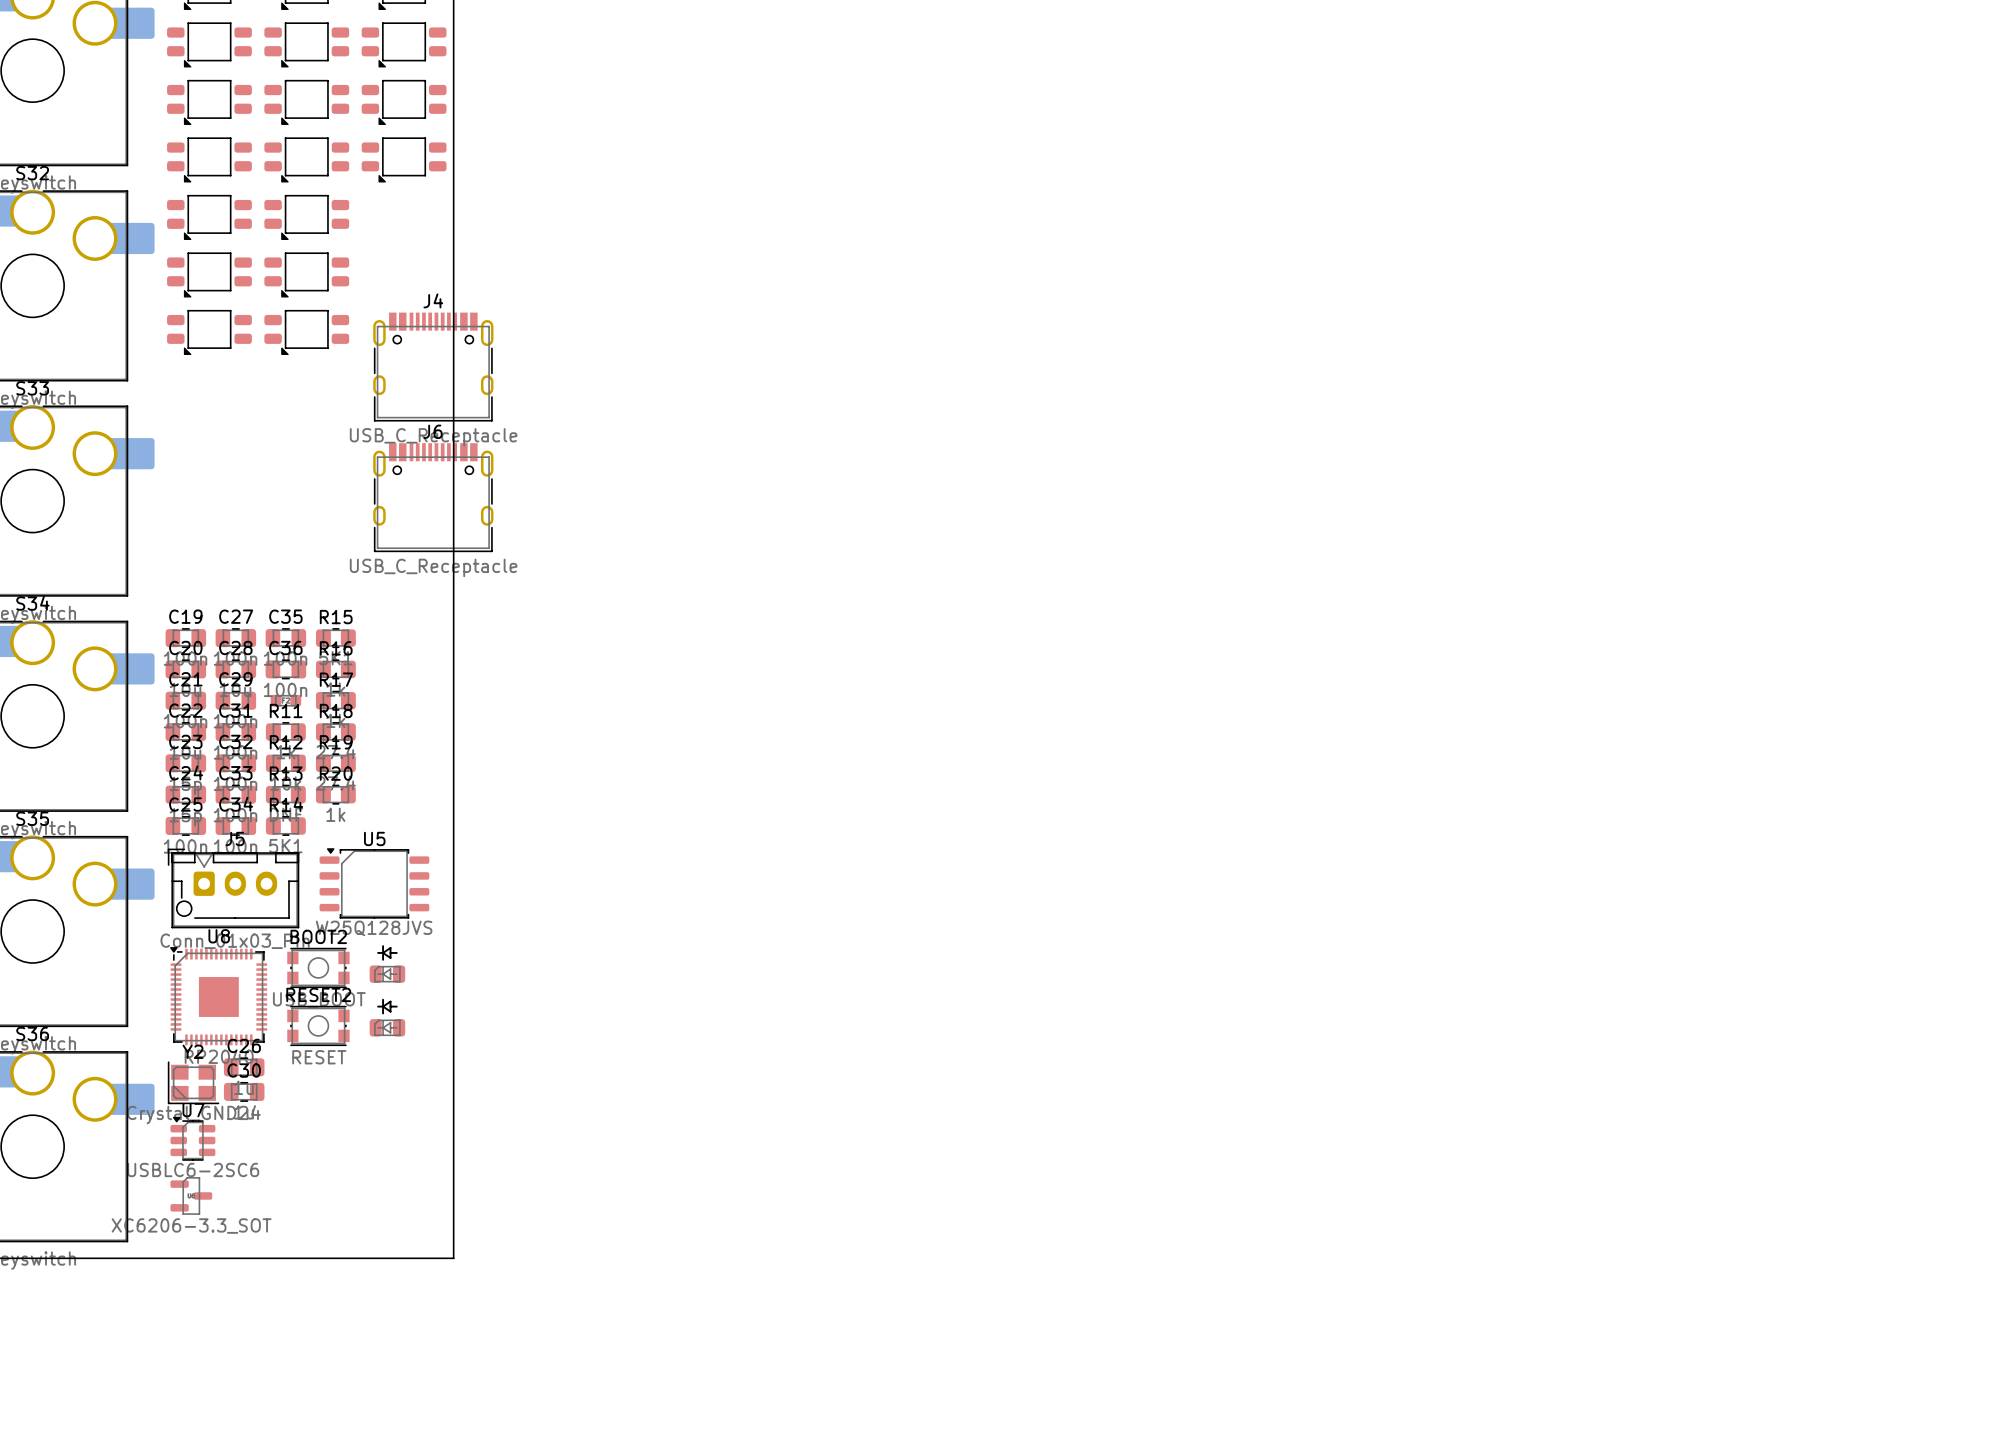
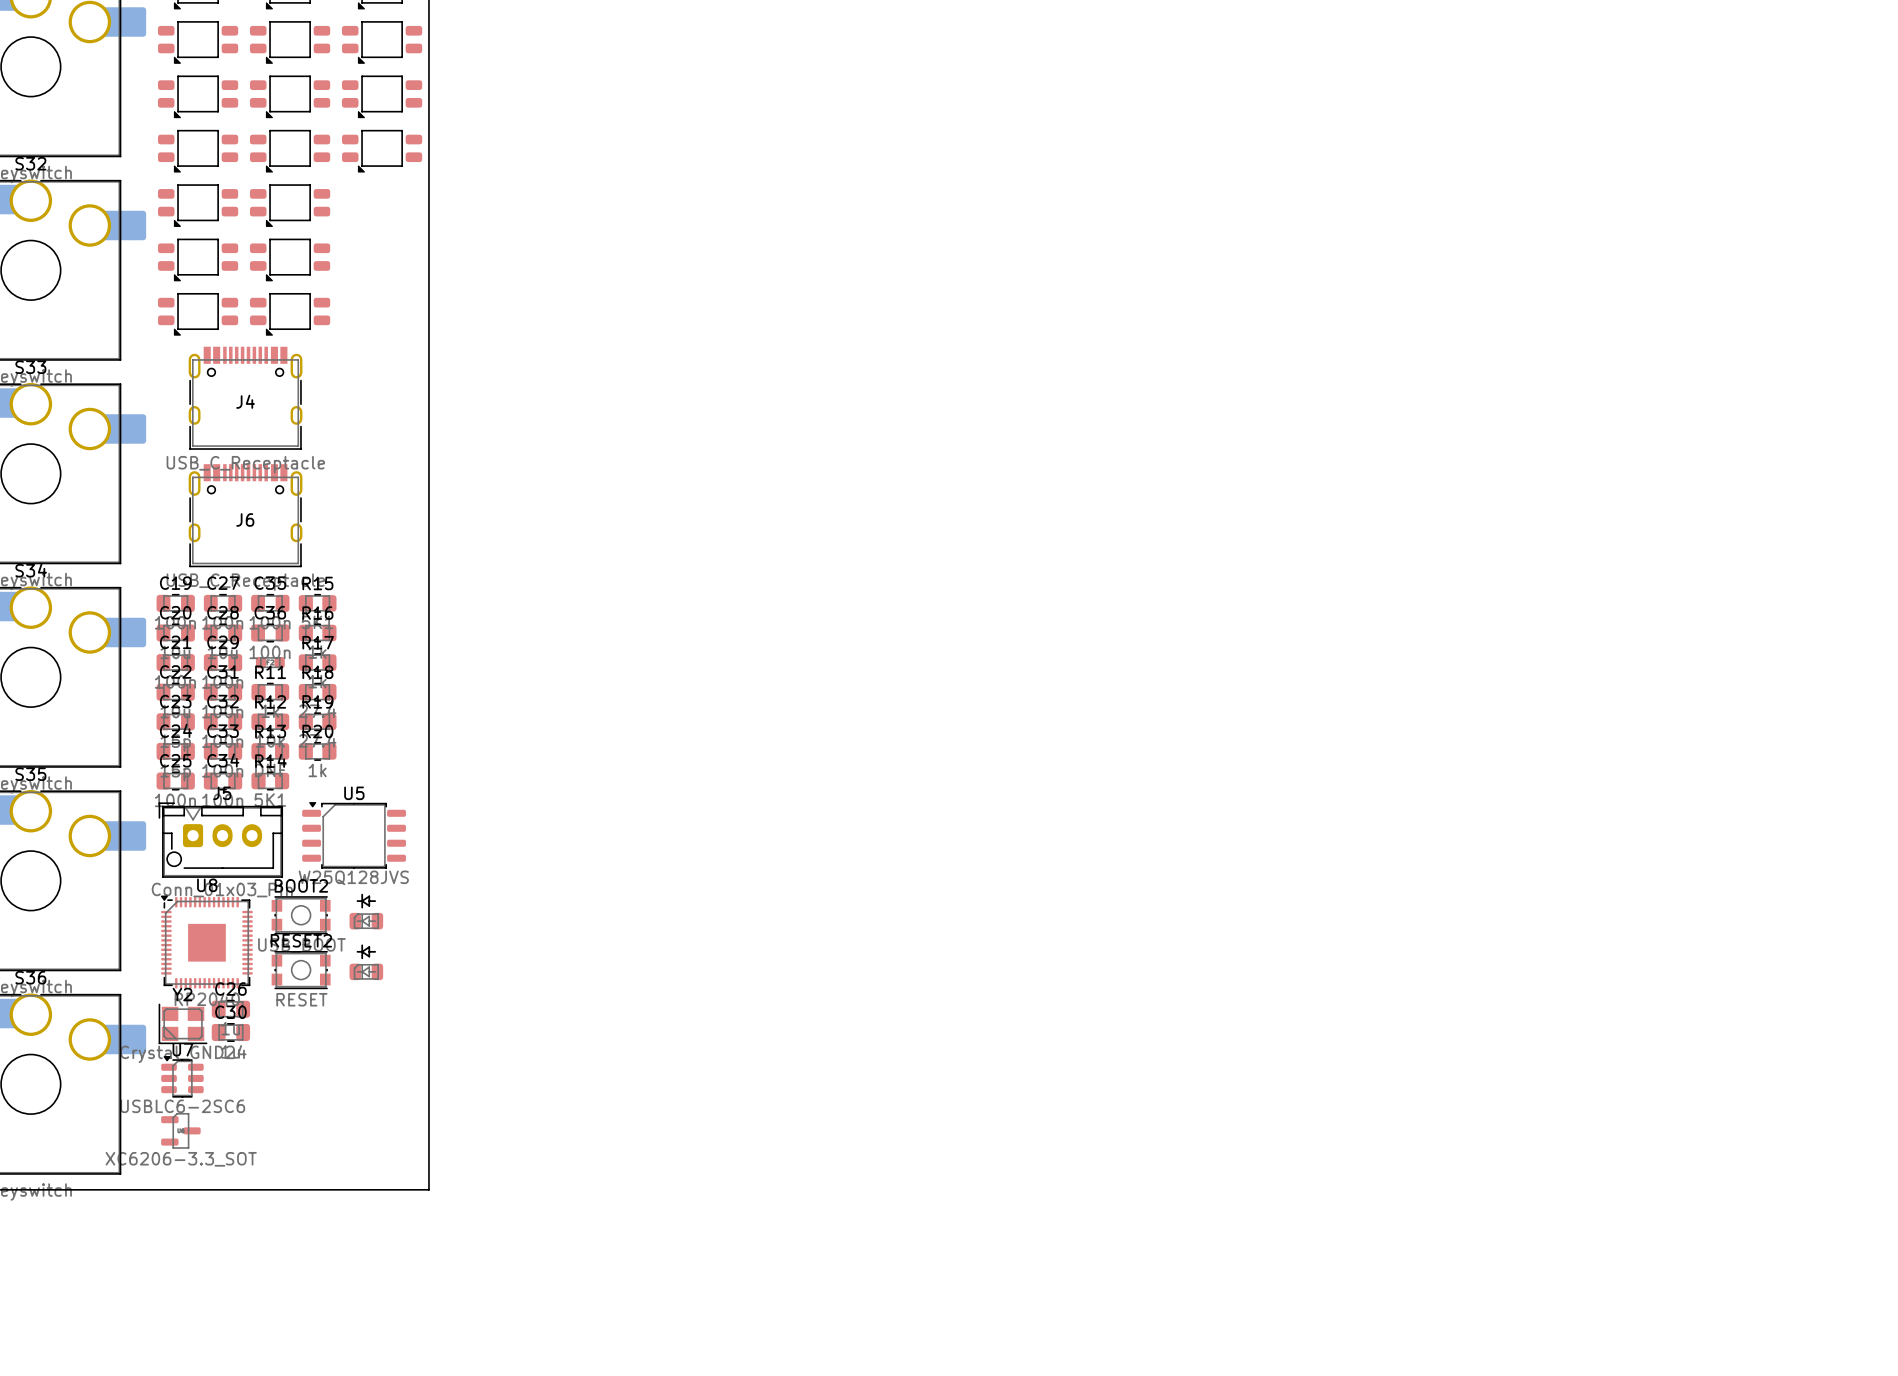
J4 name position: J4 (433, 300) -> J4 (245, 401)
J4 position: (433, 367) -> (245, 398)
J6 name position: J6 (433, 431) -> J6 (245, 519)
J6 position: (433, 497) -> (245, 515)

